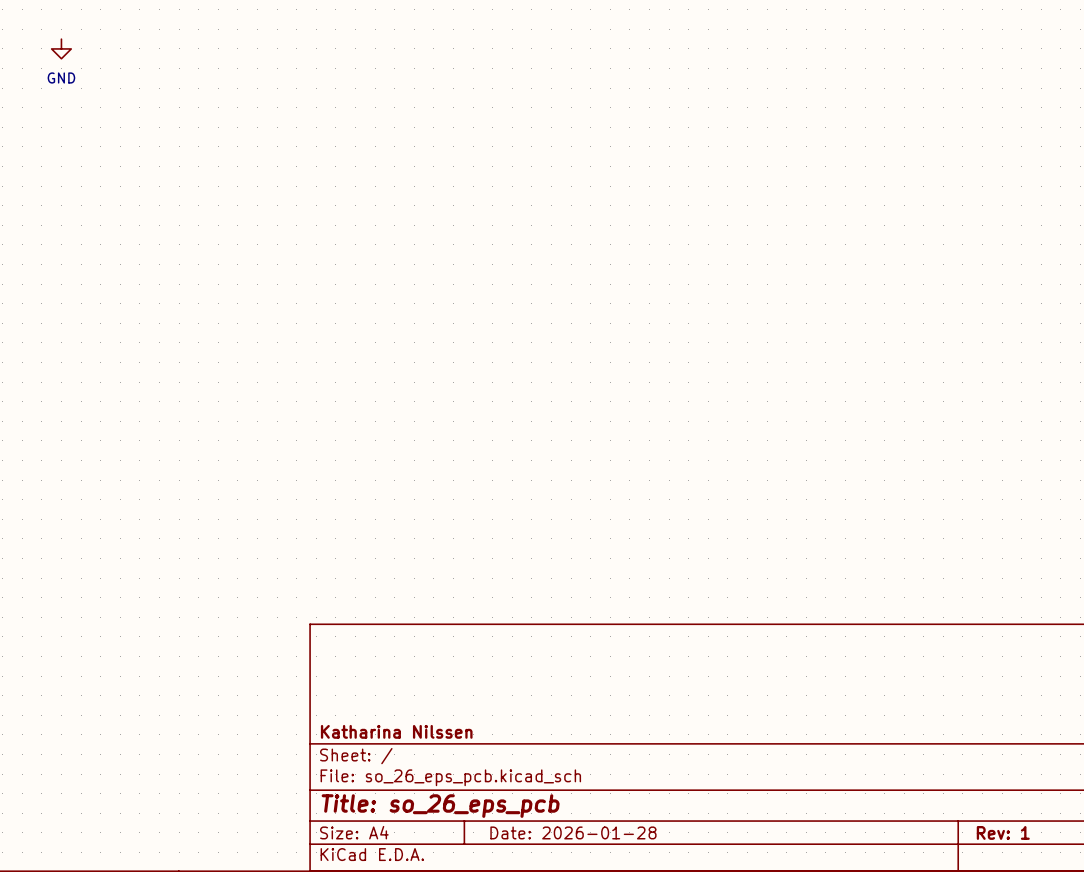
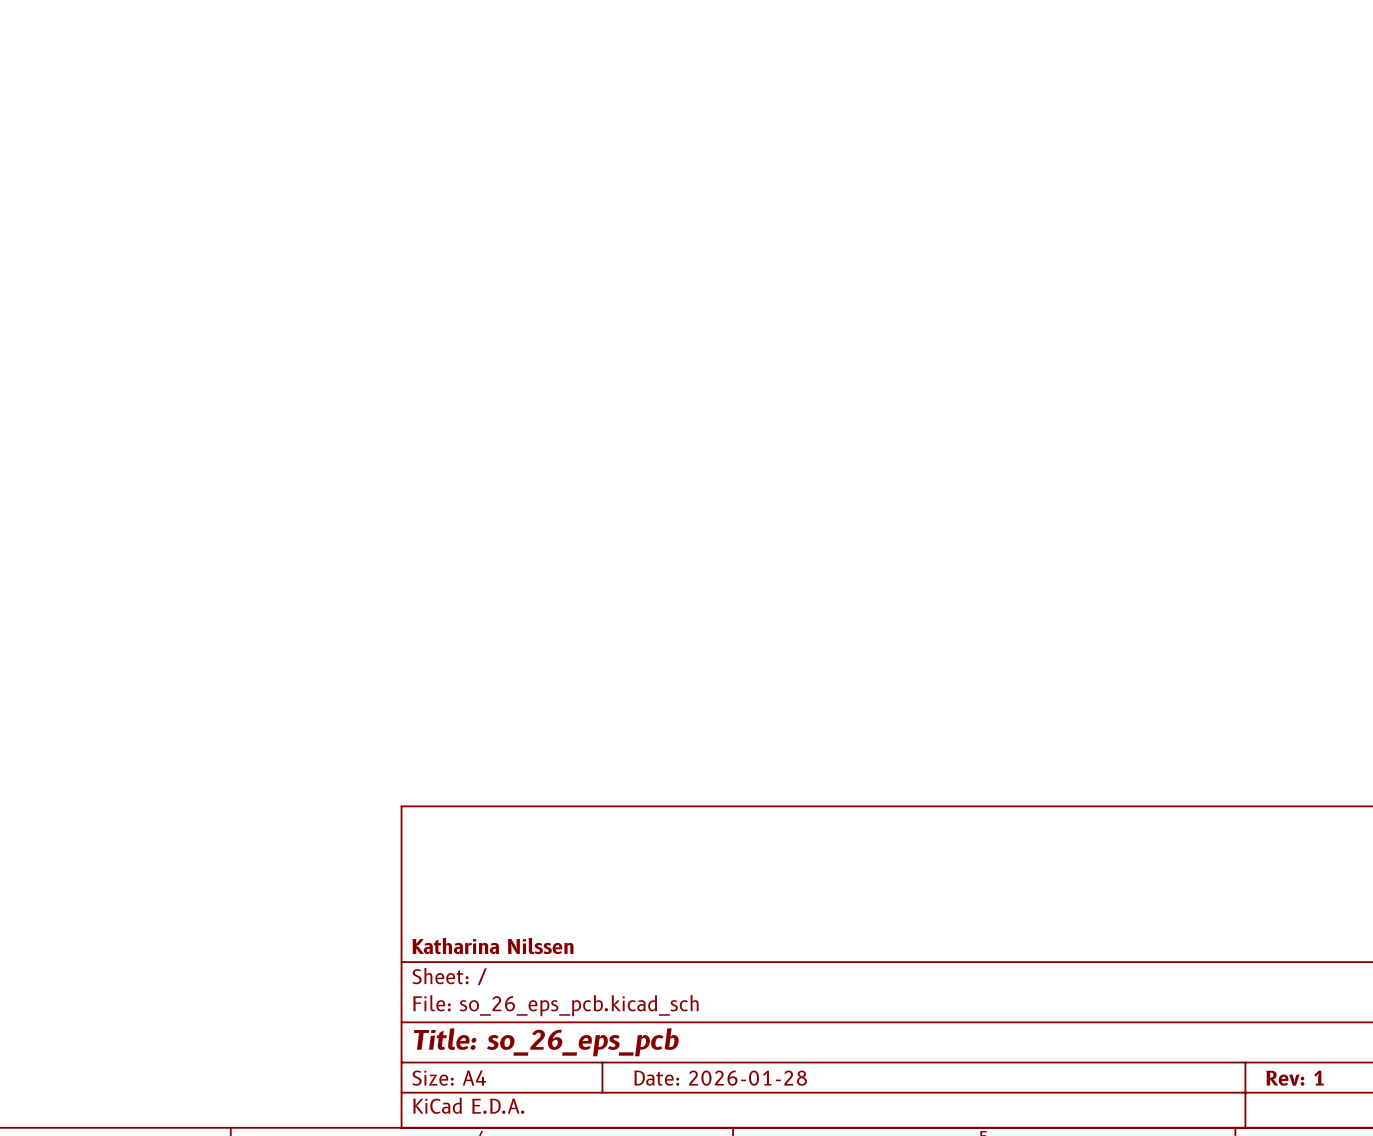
power symbol: GND (61, 48) -> none

